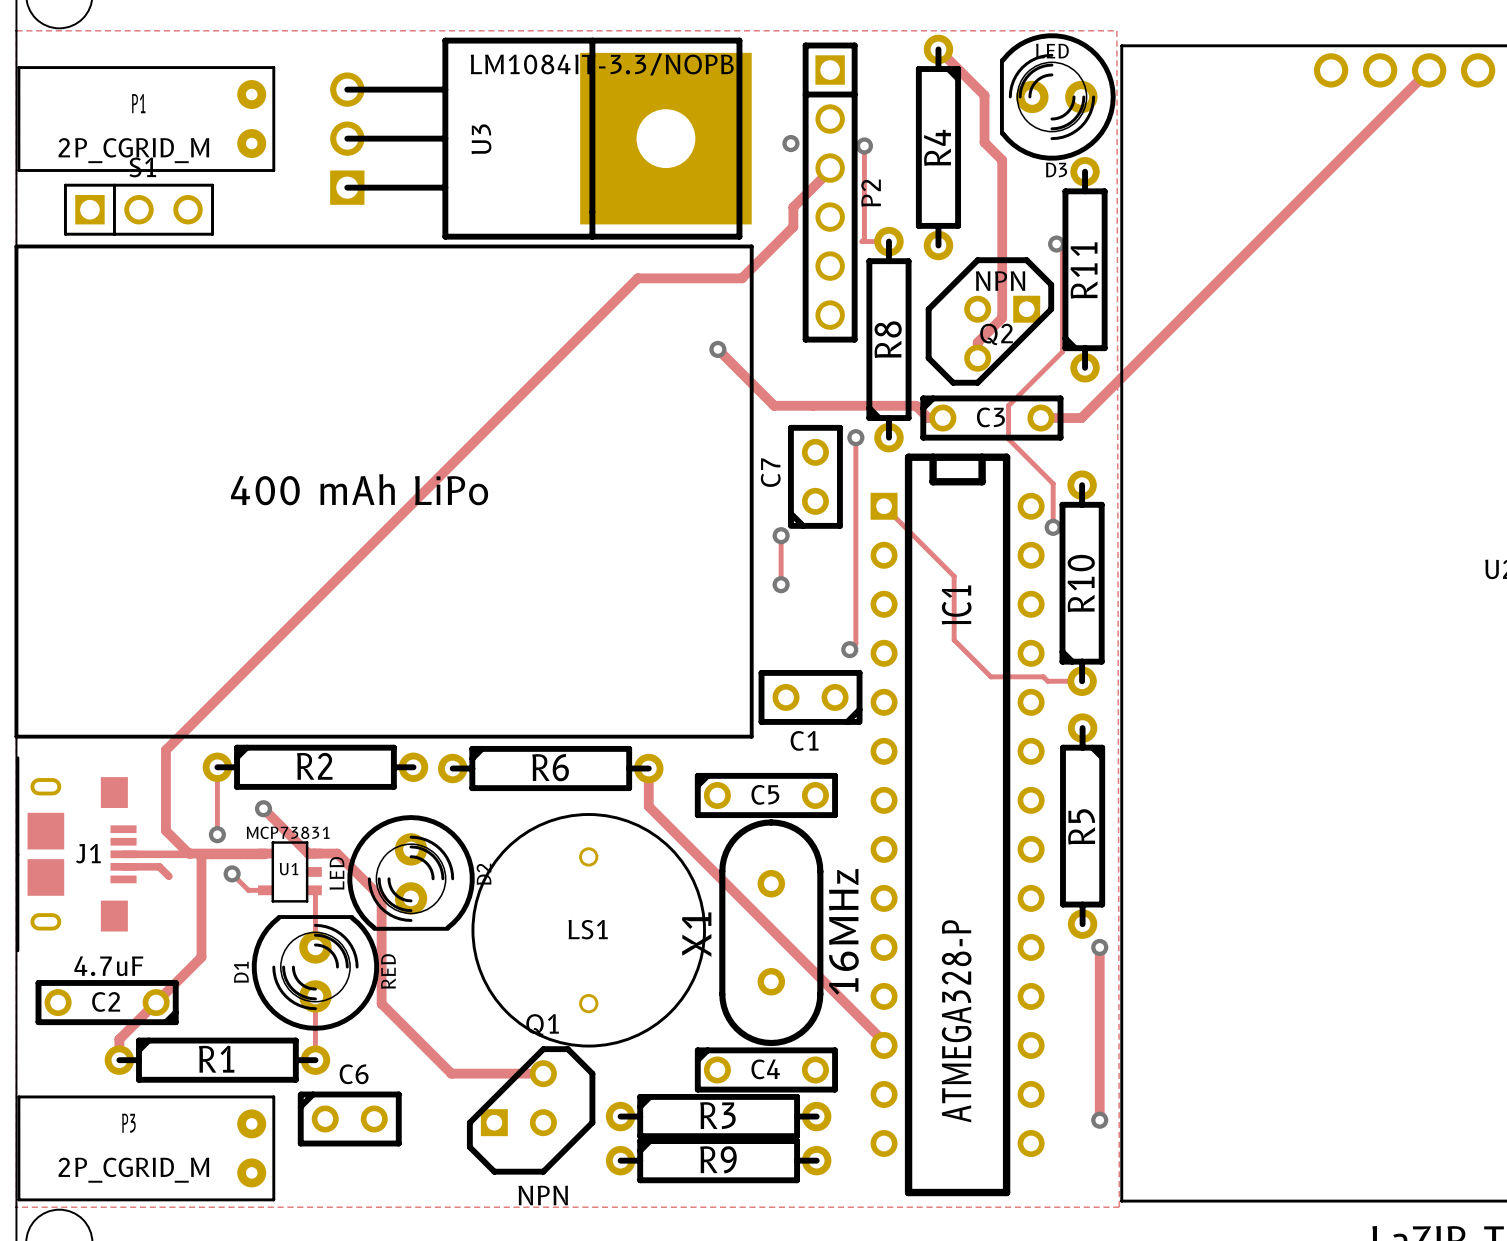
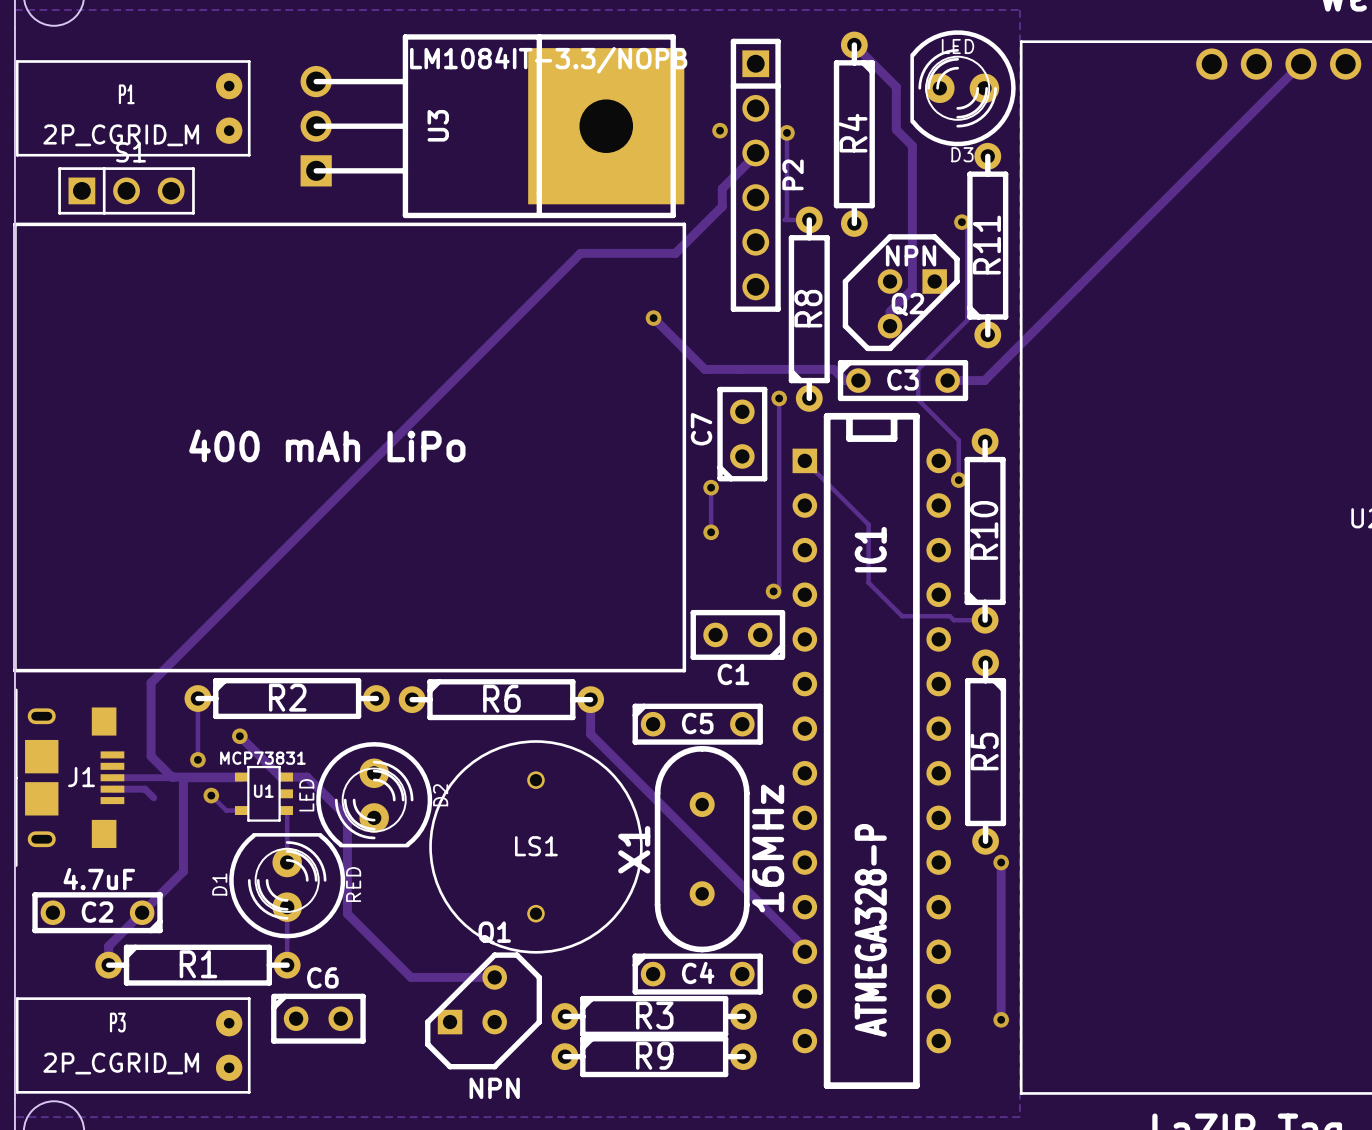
zone outline: (16, 30) (1116, 30) (1119, 1207) (16, 1207) -> (14, 28) (14, 9) (1019, 9) (1019, 1117) (14, 1117) (14, 1099)

